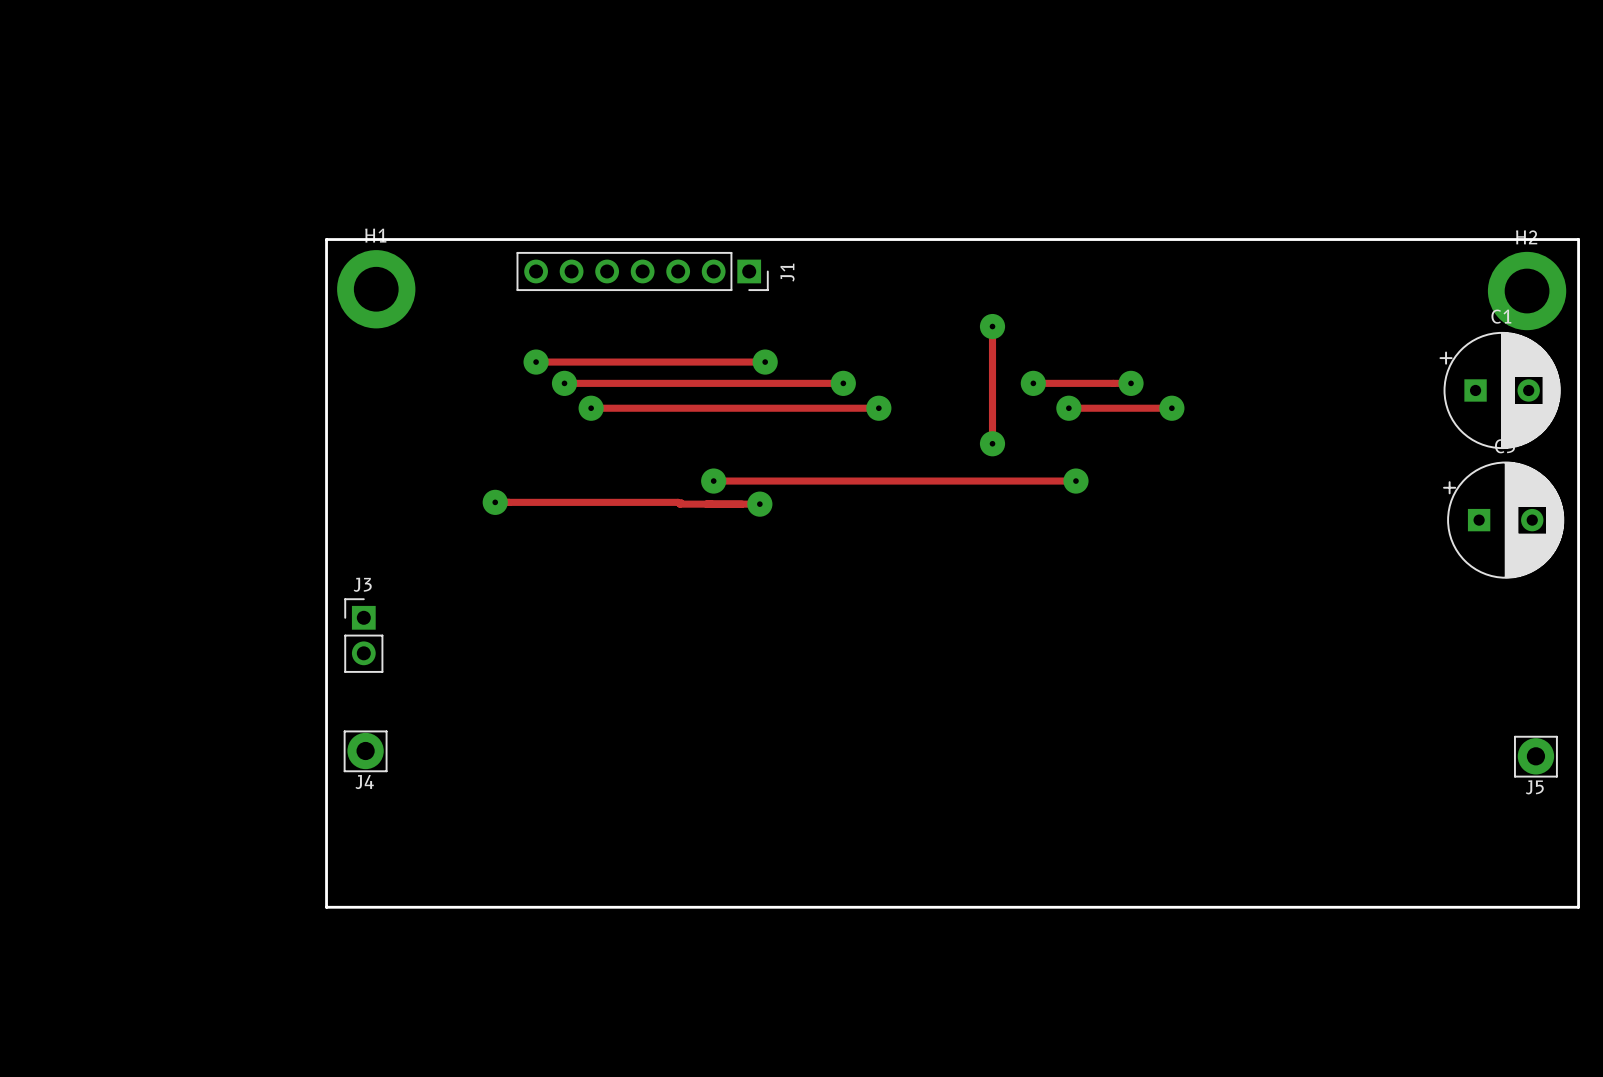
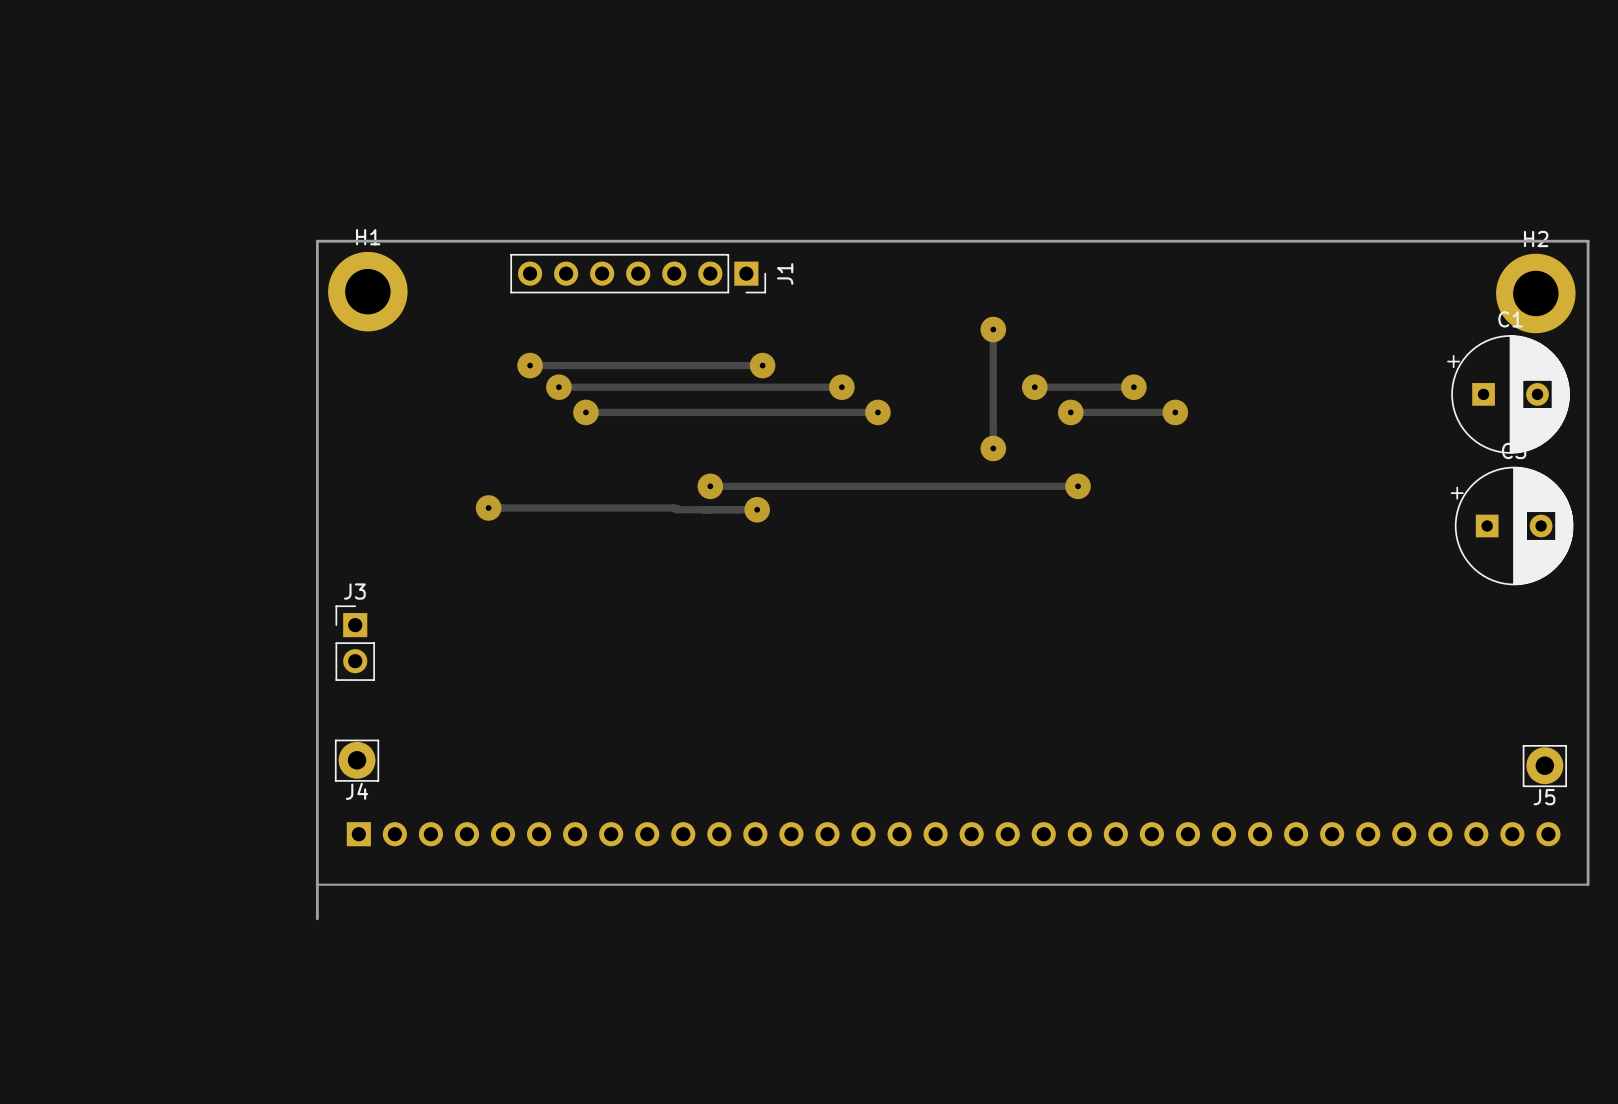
part: none -> (953, 834)
board edge: (1578, 873) (1578, 907) (326, 907) -> (1588, 884) (317, 884)

